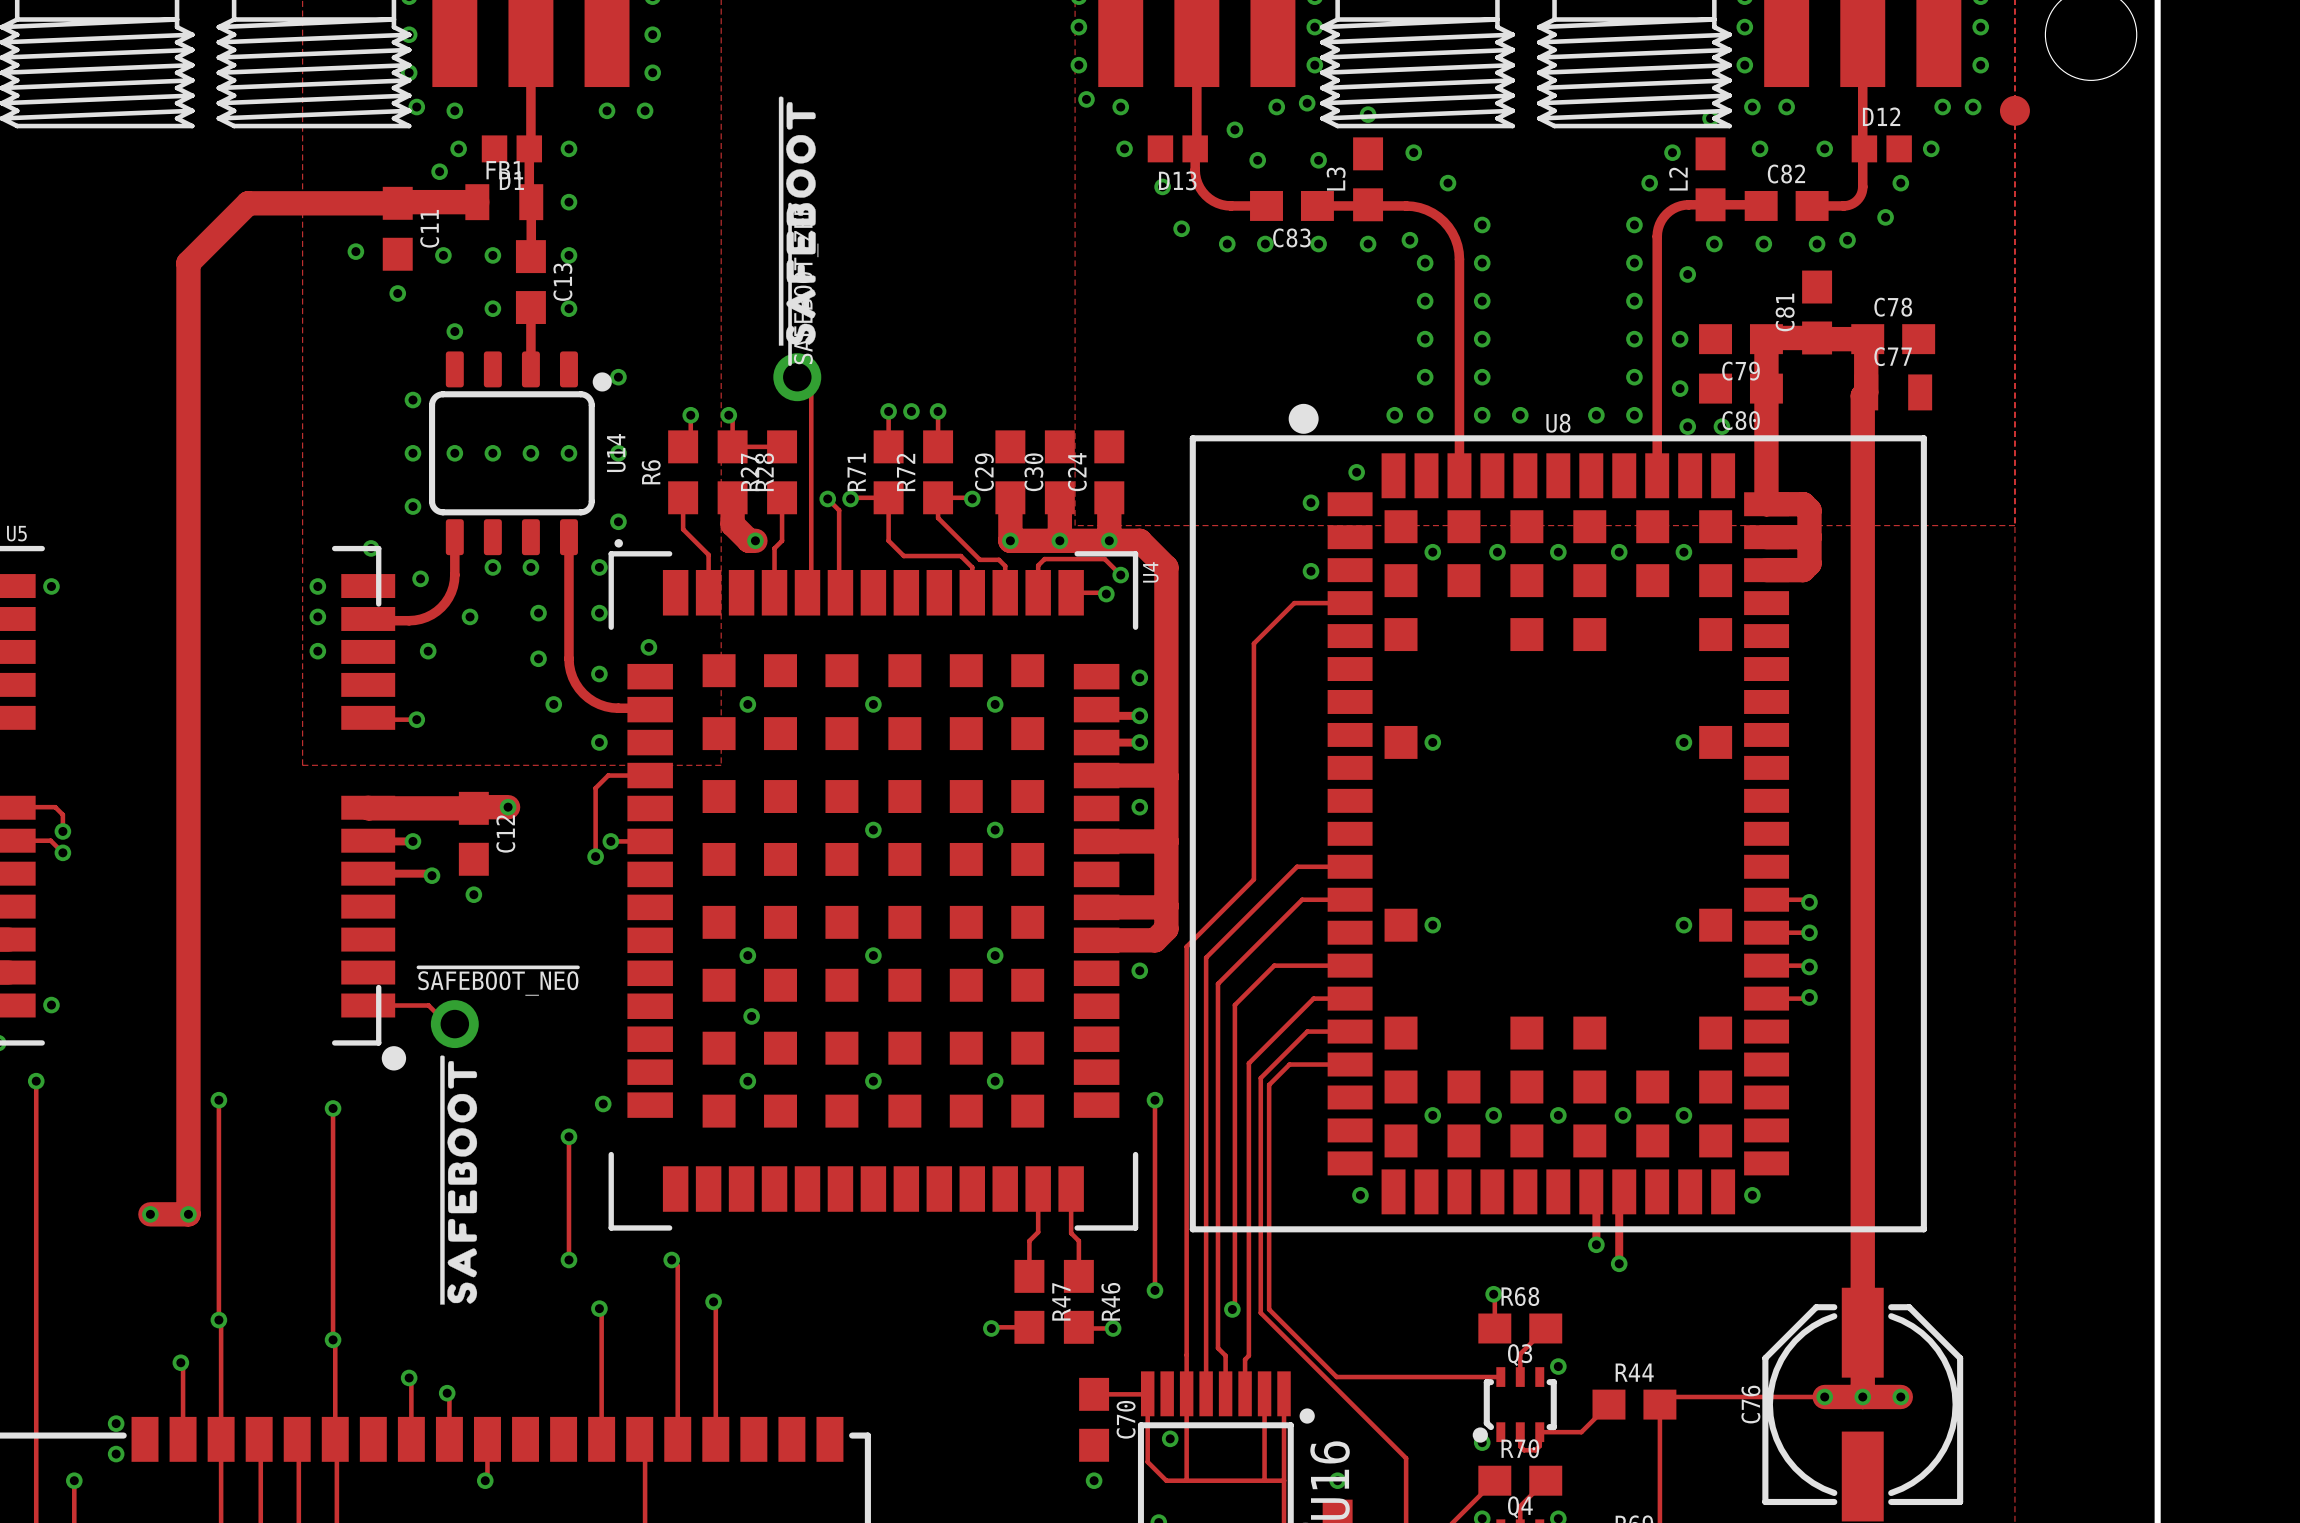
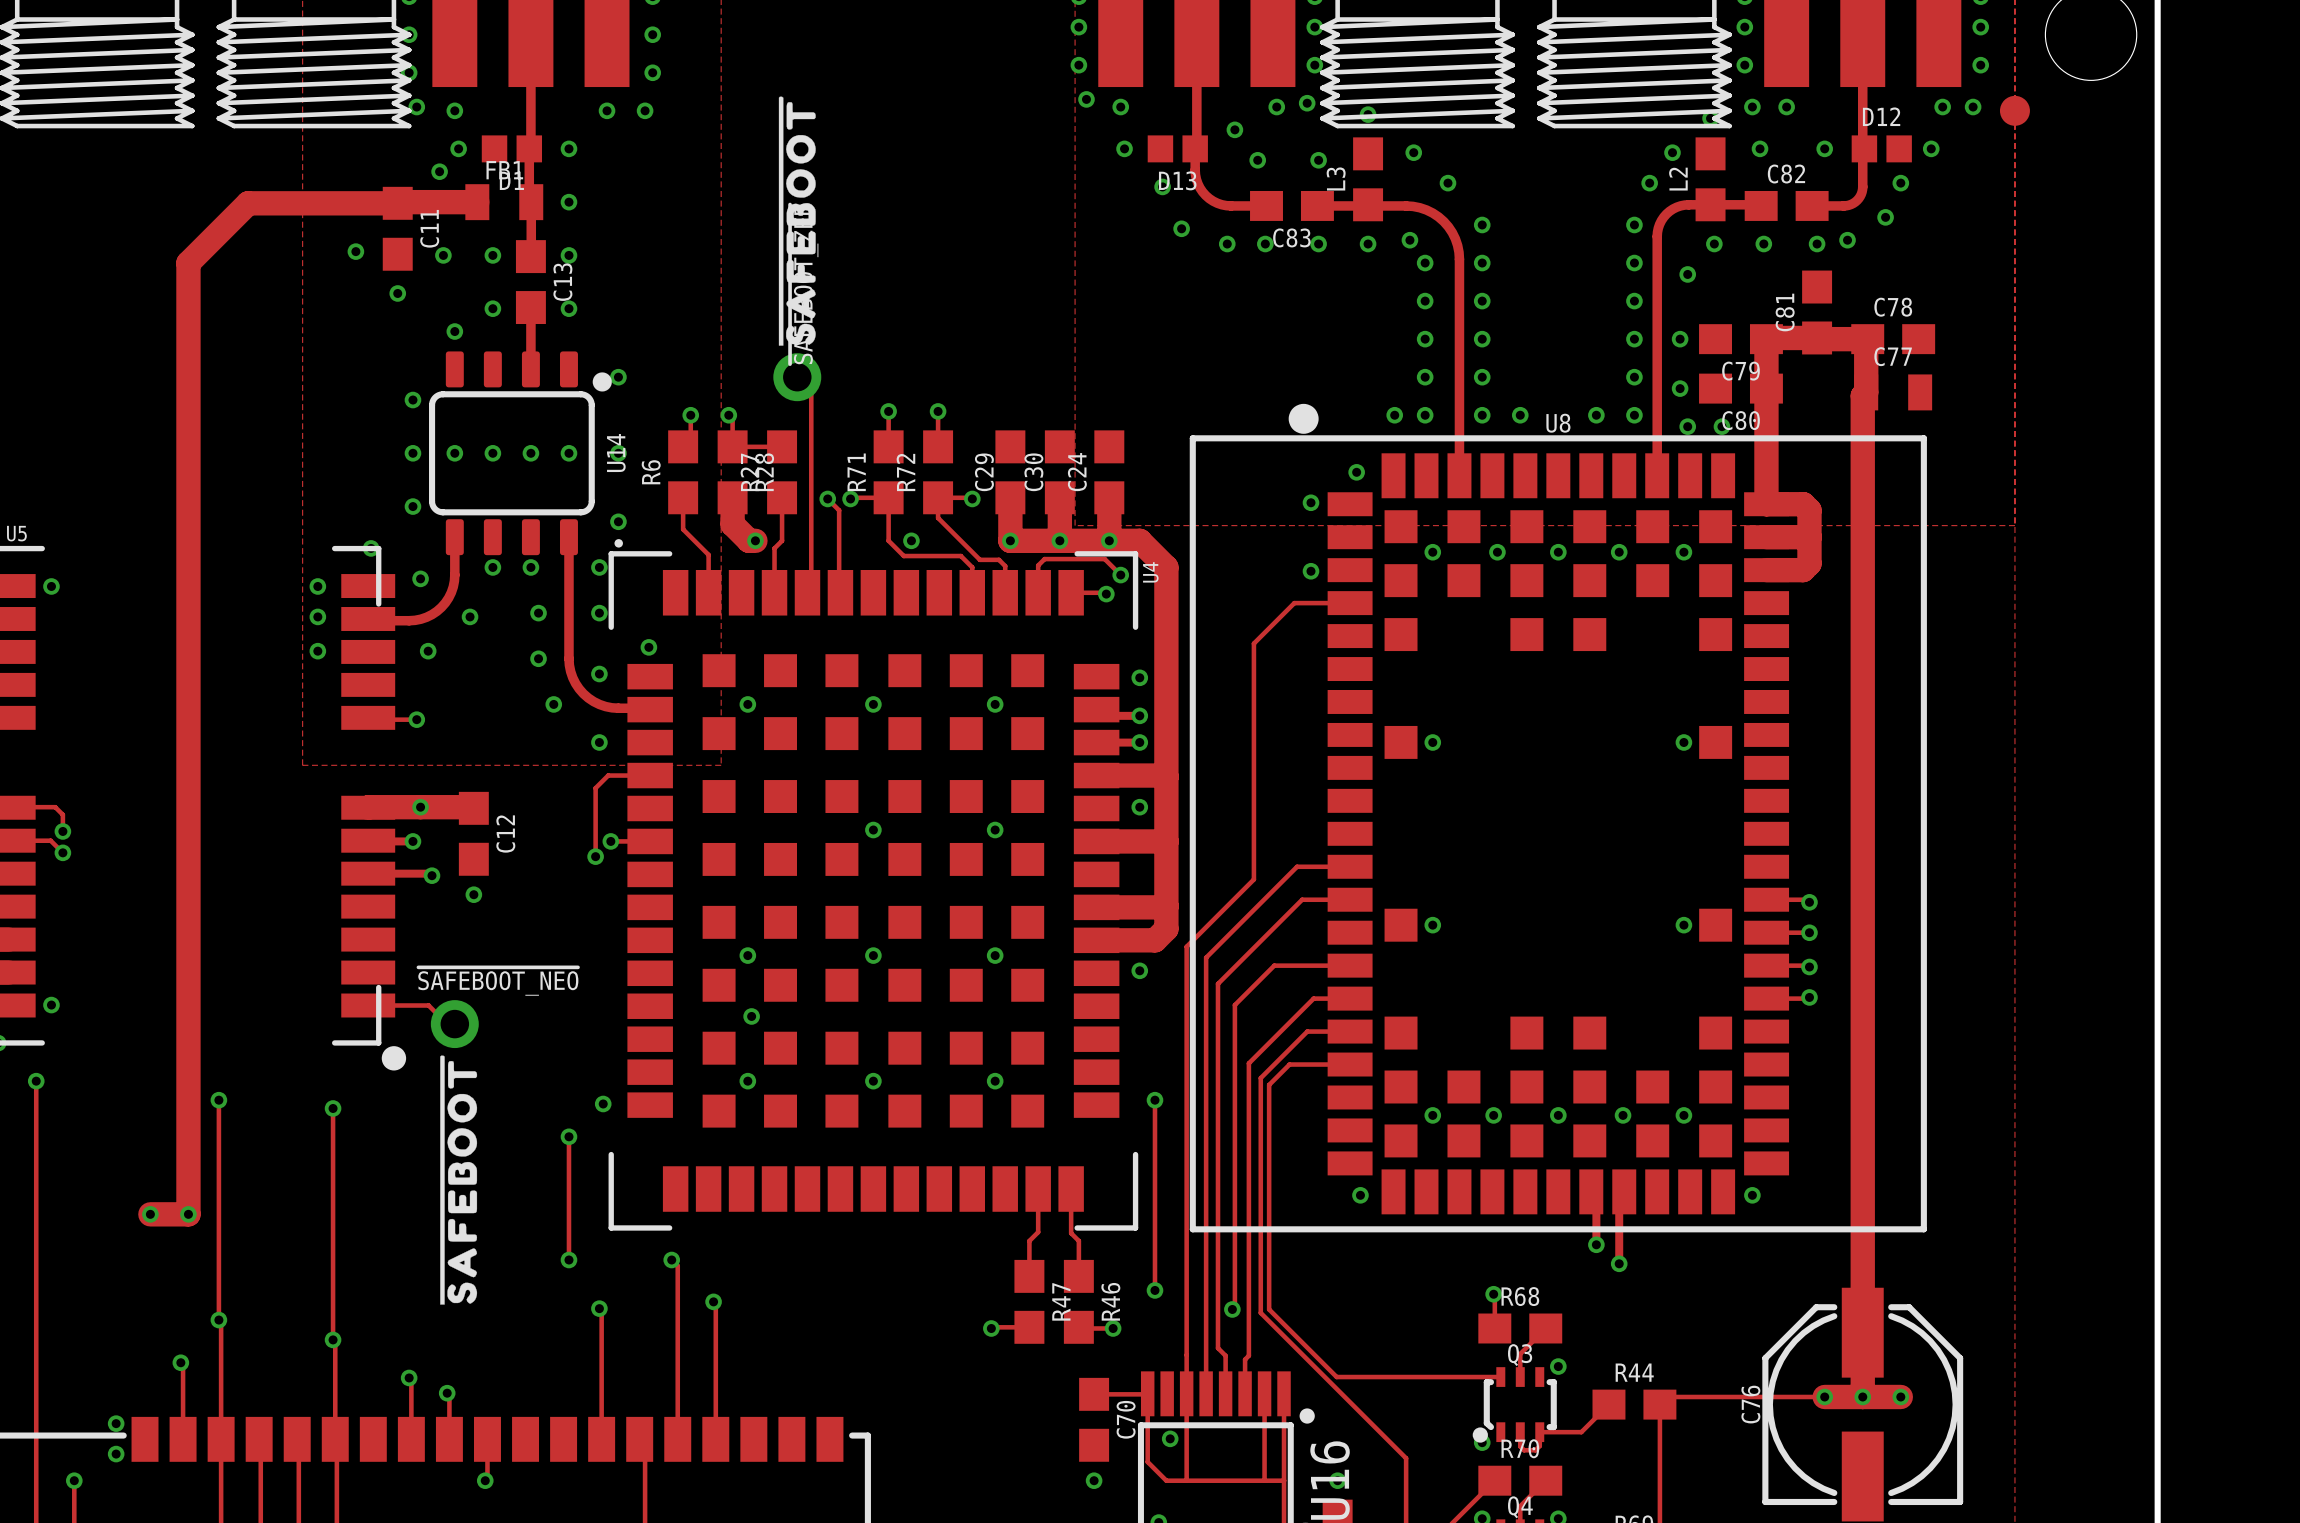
via position: (911, 411) -> (911, 540)
track: (508, 807) (368, 807) -> (473, 808) (368, 807)
via position: (508, 807) -> (420, 807)

